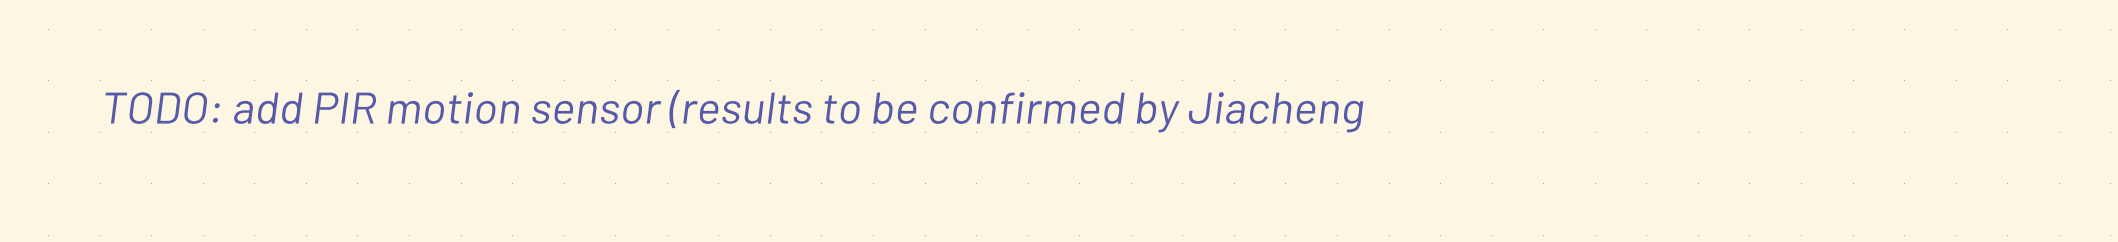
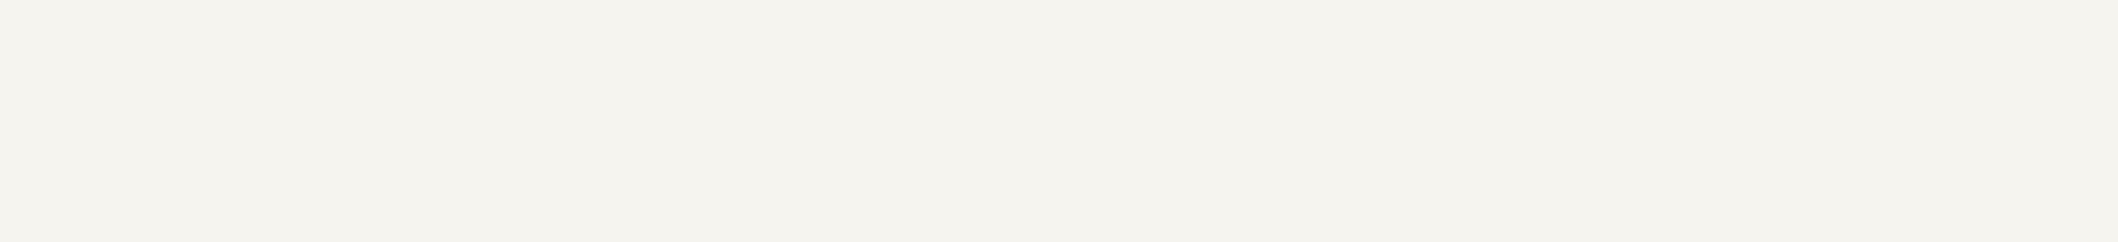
text: TODO: add PIR motion sensor (results to be confirmed by Jiacheng (734, 111) -> none

